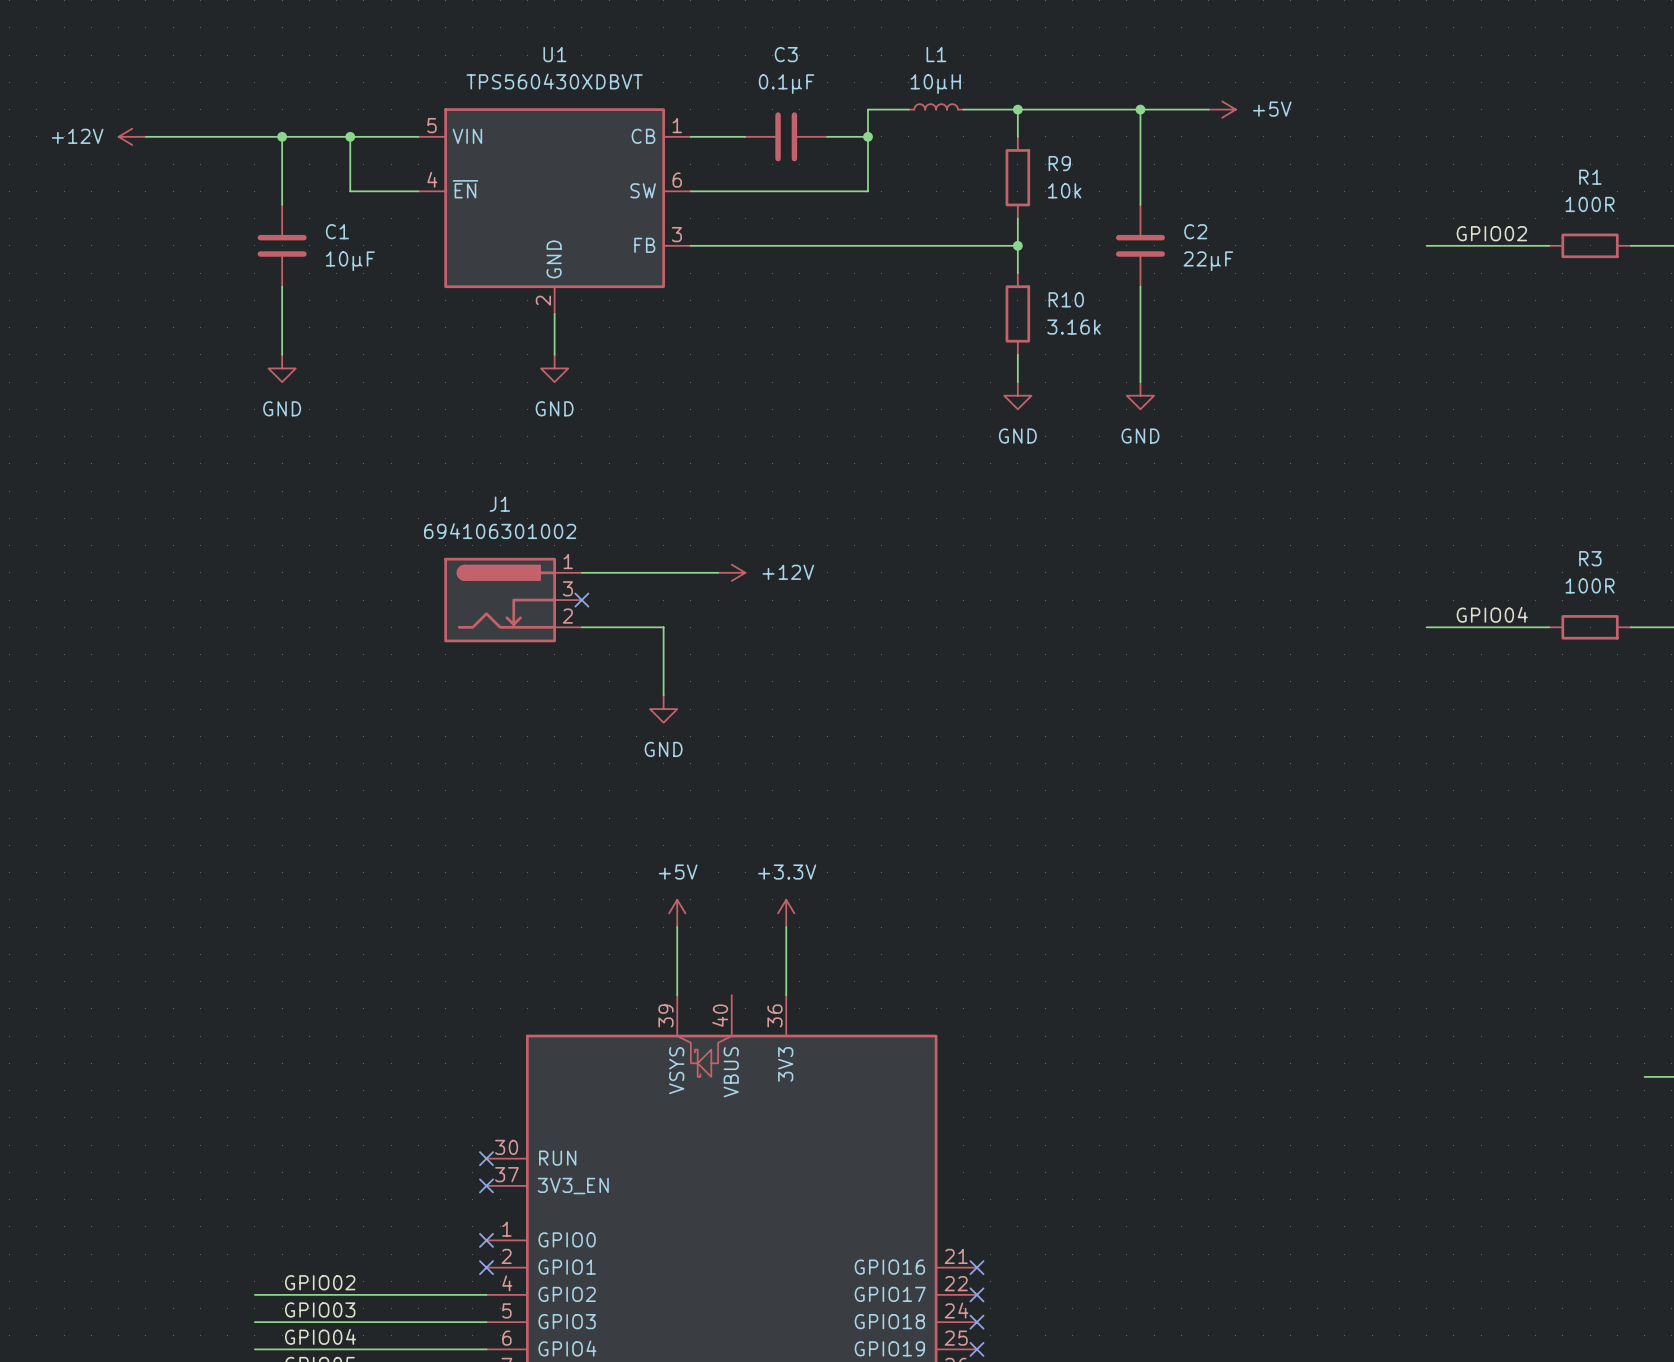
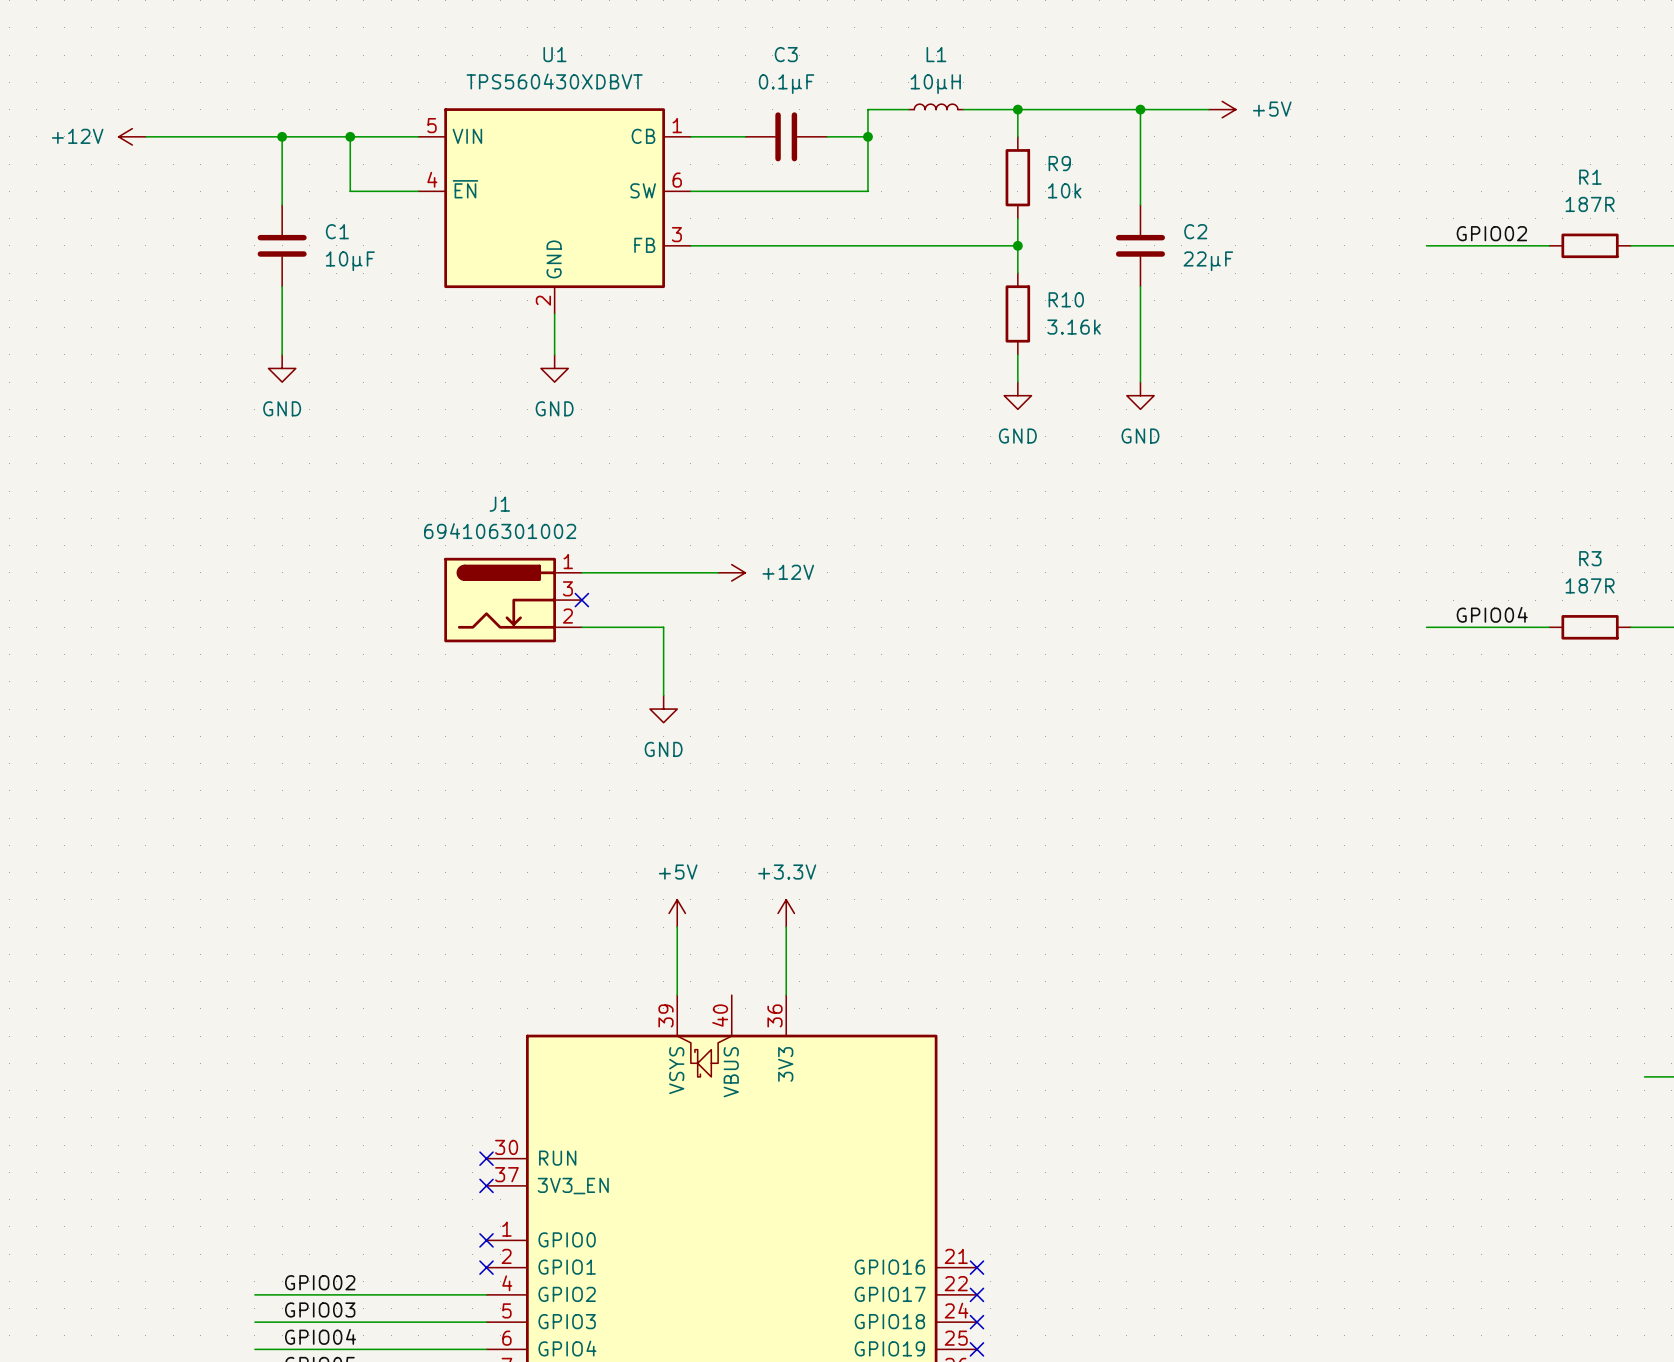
R1 value: 100R (1590, 204) -> 187R (1590, 204)
R3 value: 100R (1590, 585) -> 187R (1590, 585)

